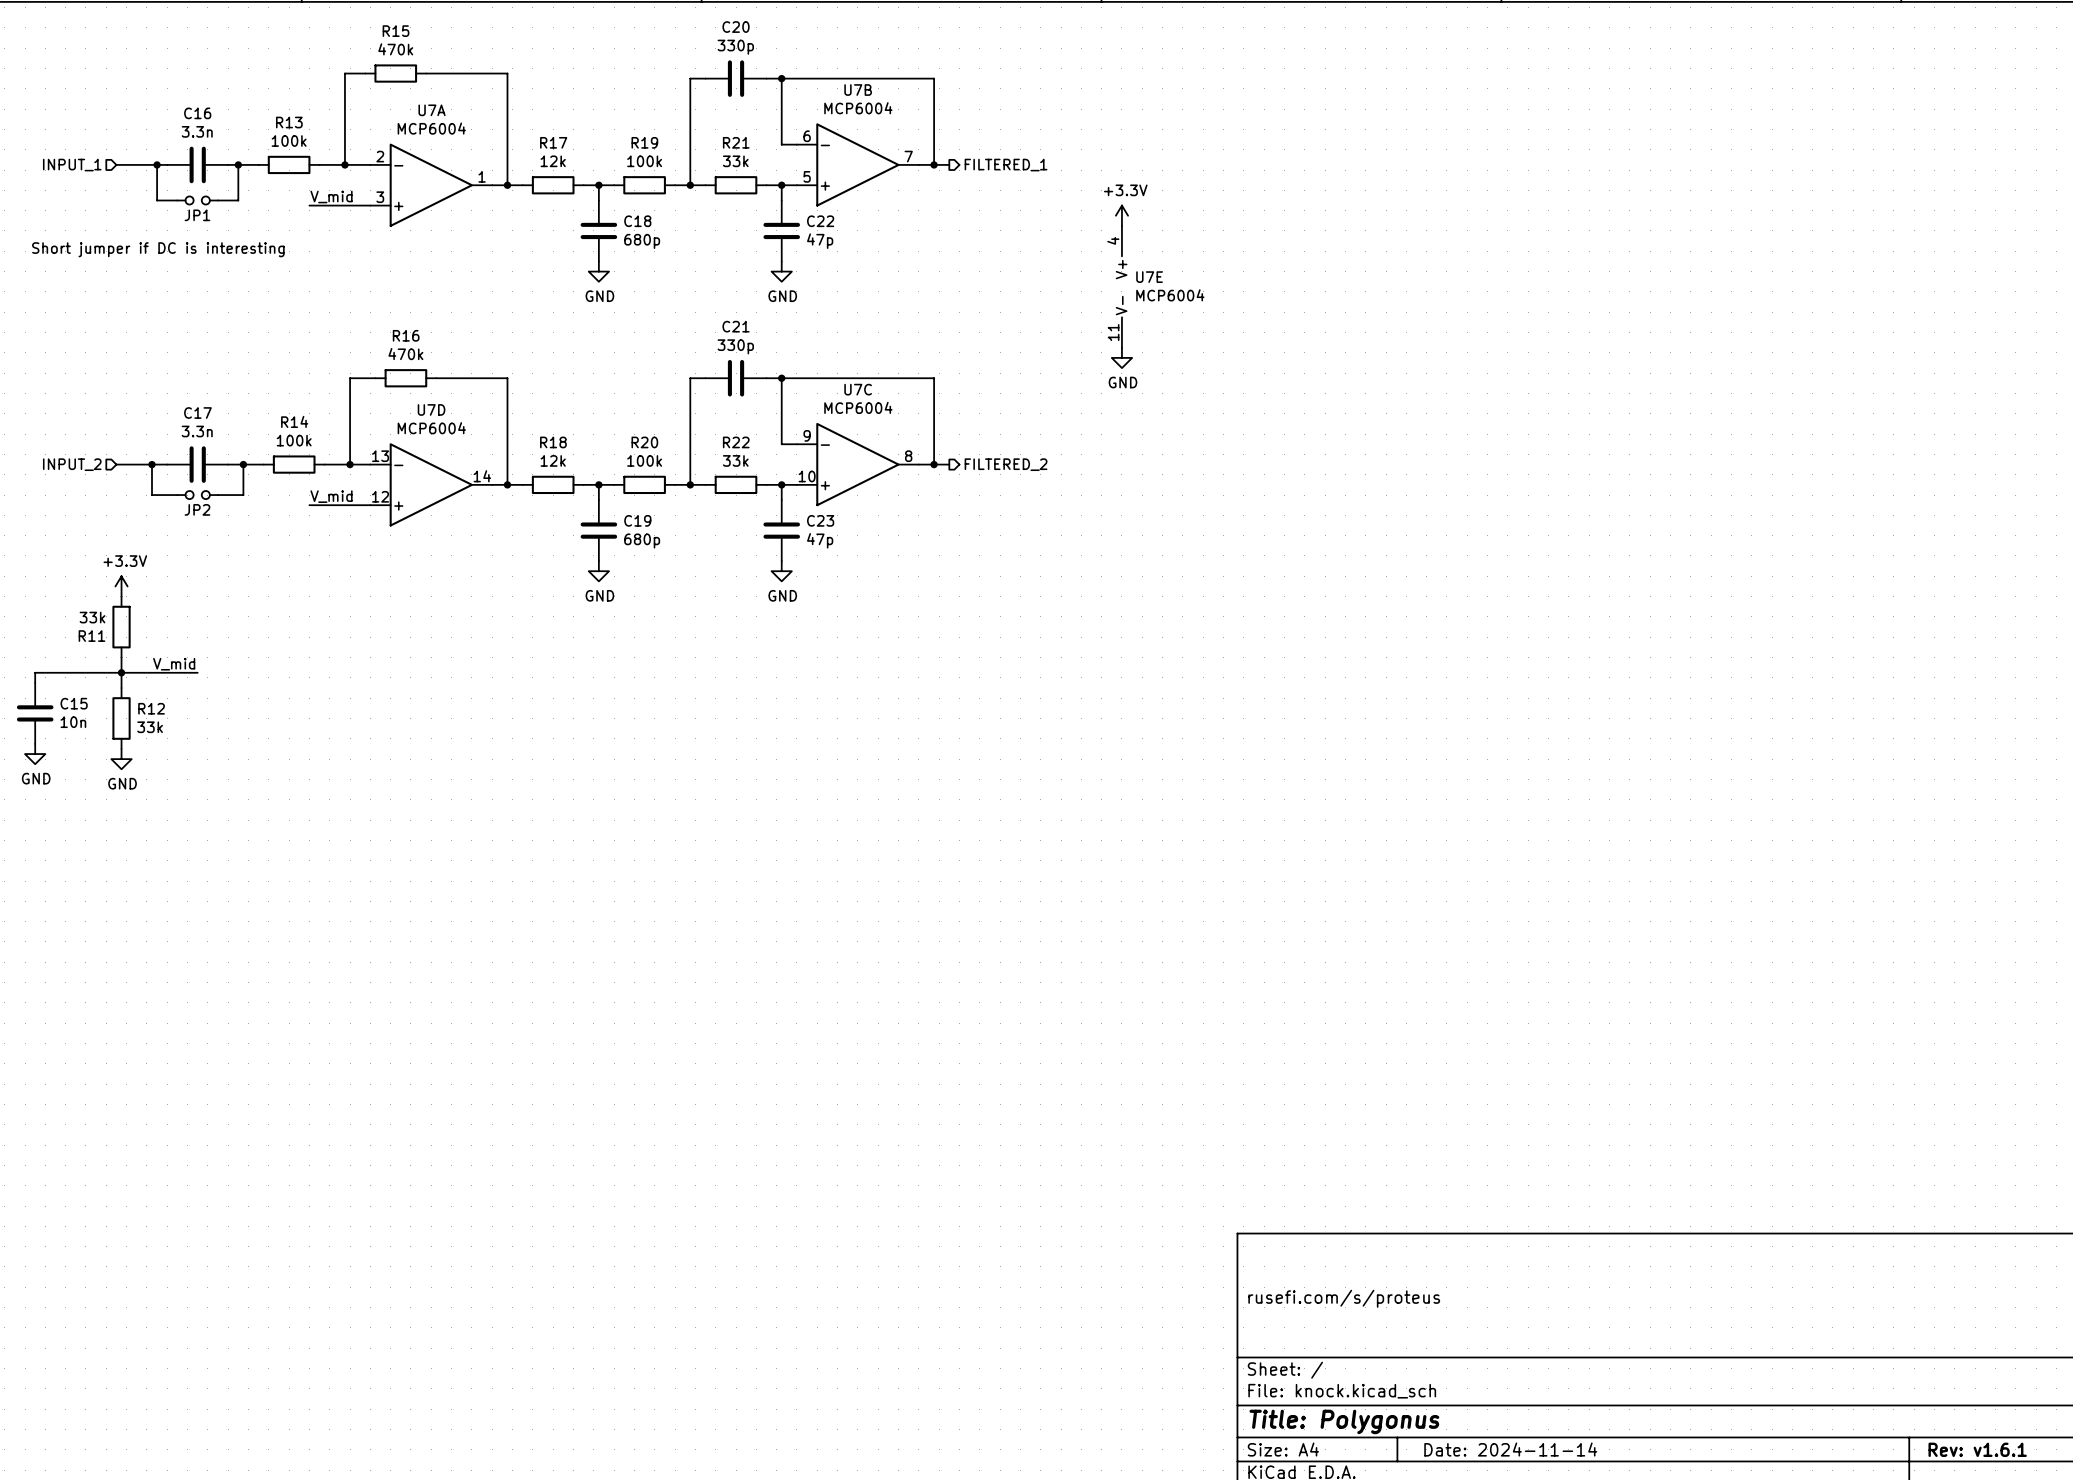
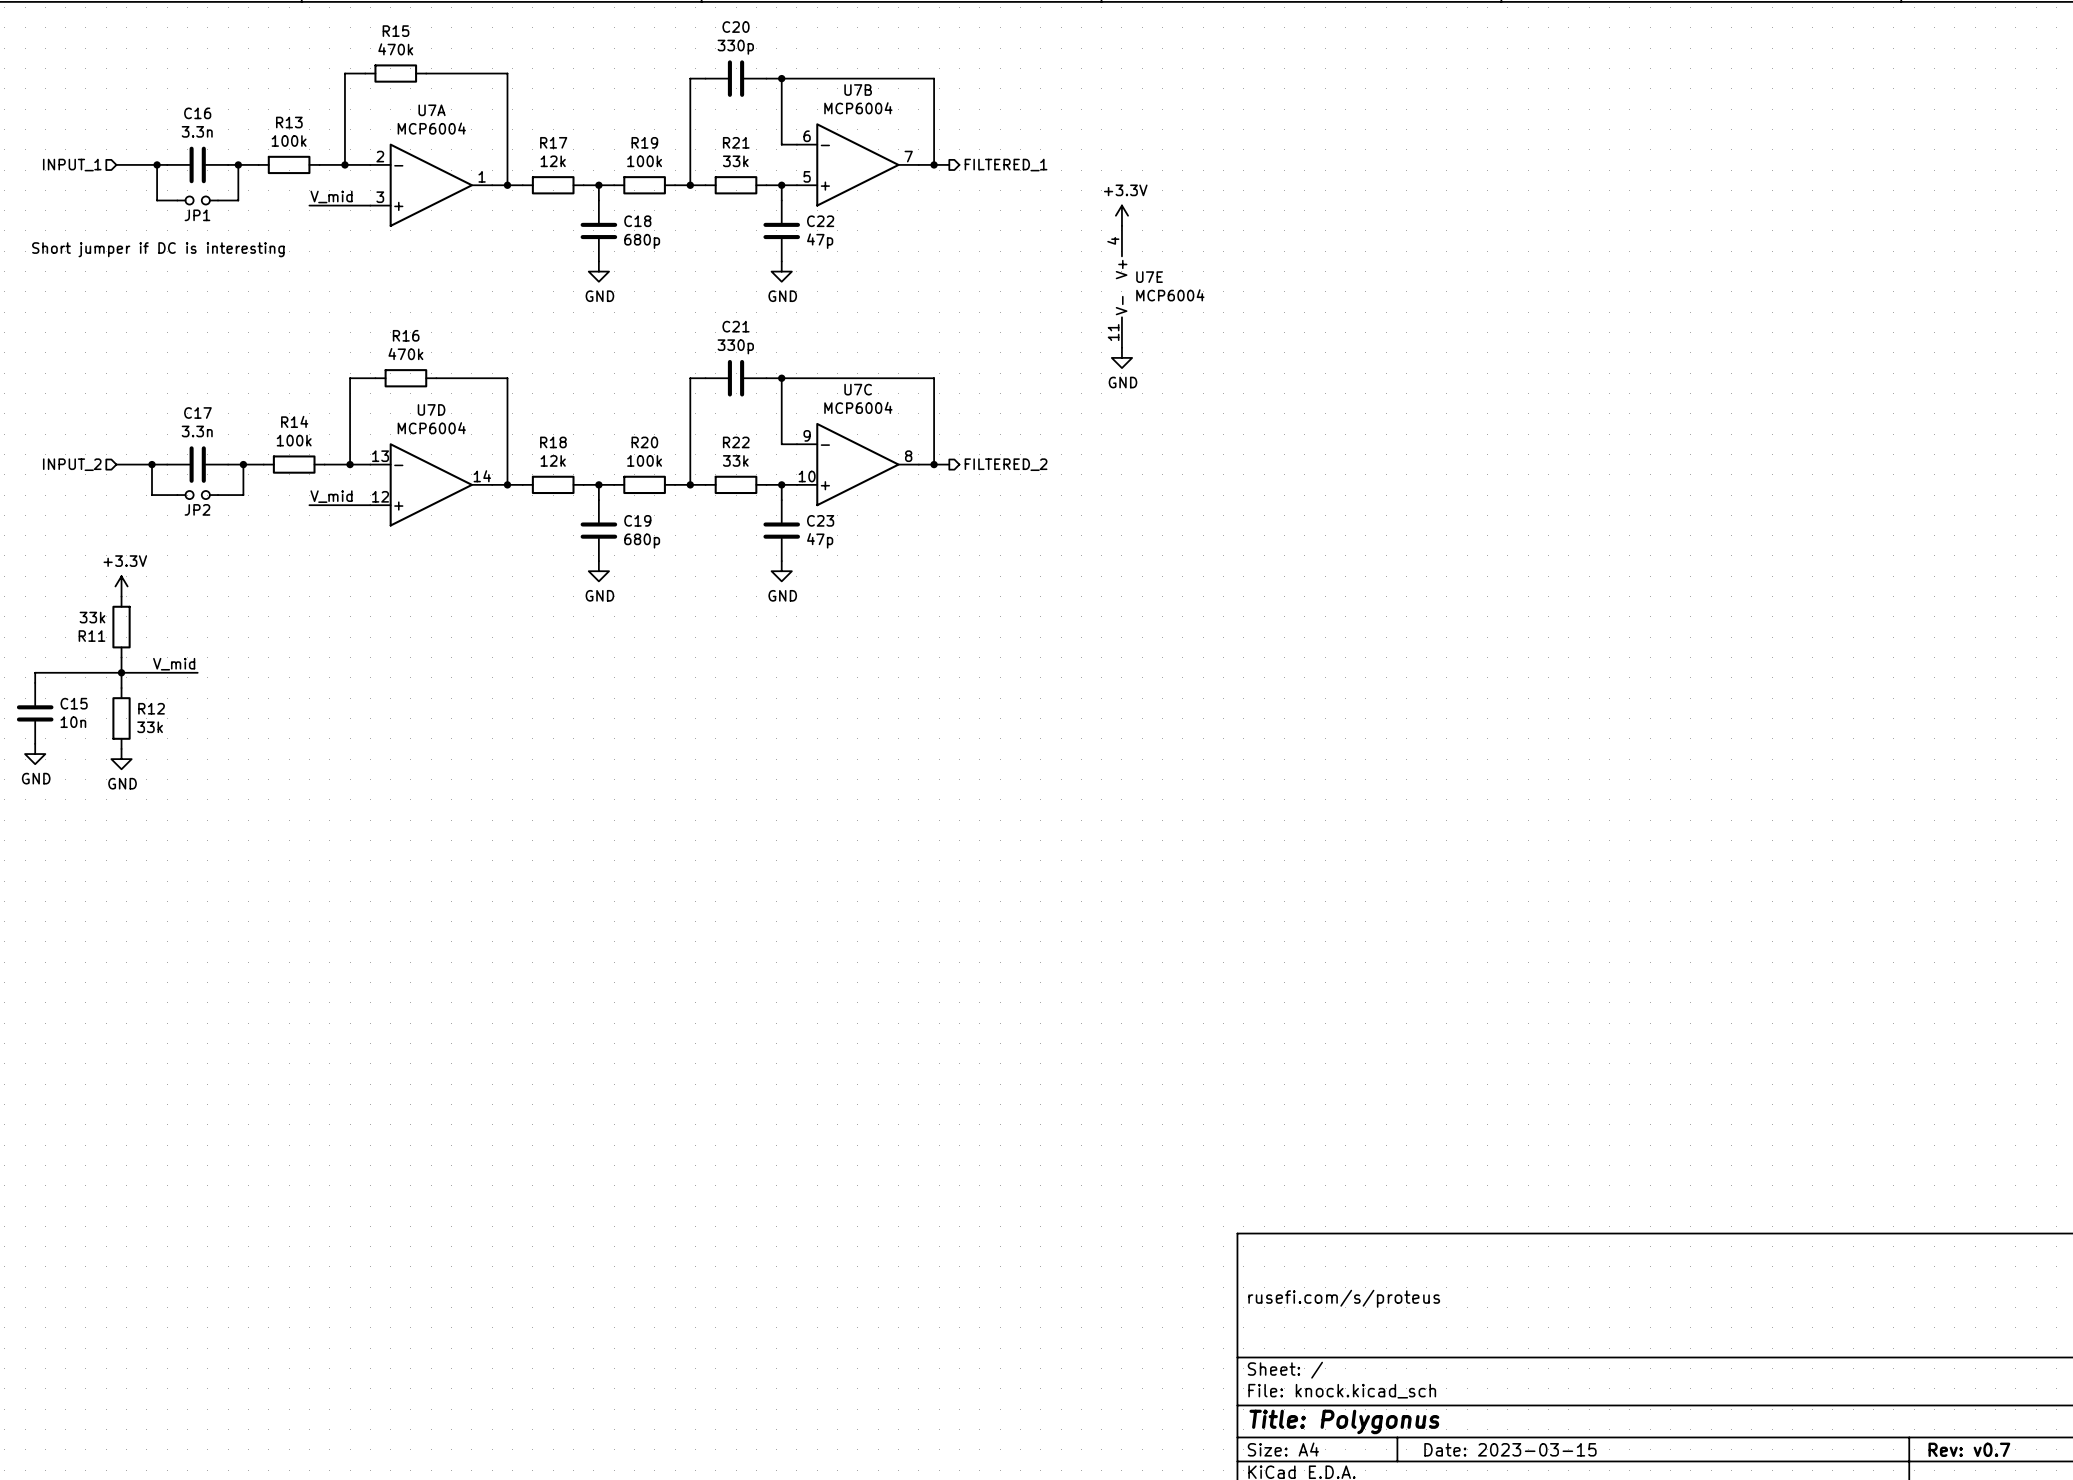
title block: Date: 2024-11-14 (1510, 1449) -> Date: 2023-03-15 (1510, 1449)
title block: Rev: v1.6.1 (1977, 1449) -> Rev: v0.7 (1969, 1449)

